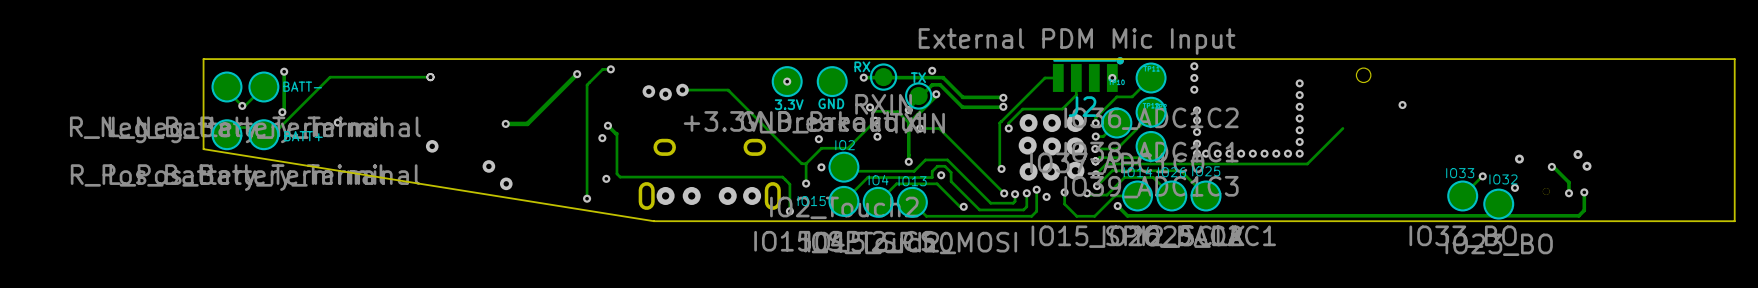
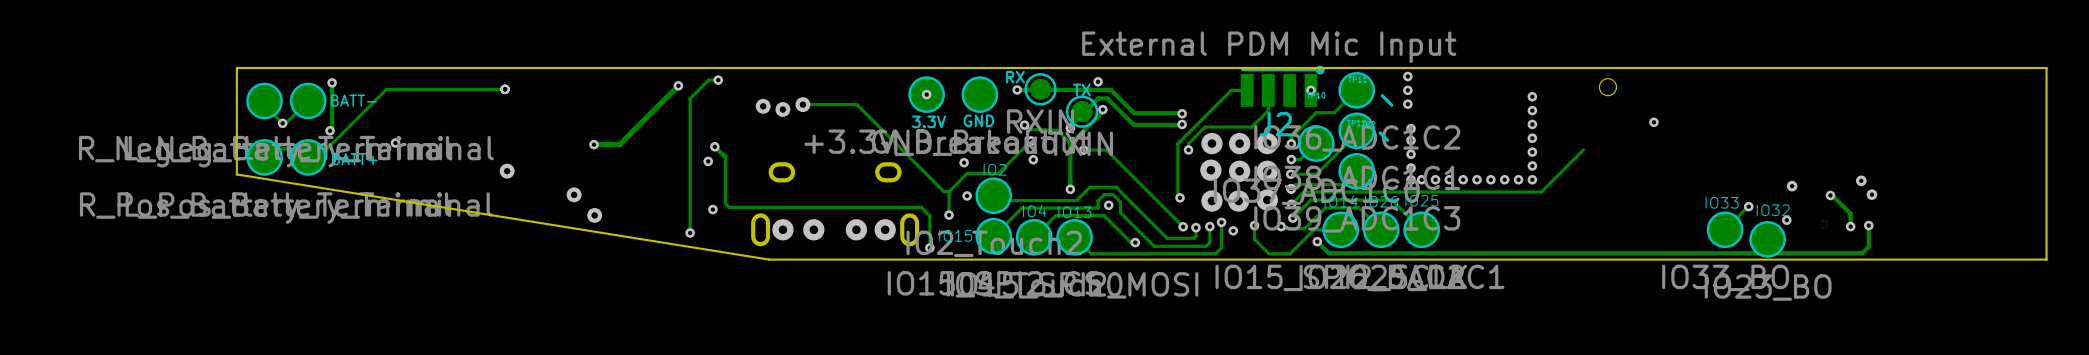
line: none -> (1382, 95) (1391, 105)
line: none -> (1380, 132) (1387, 140)

